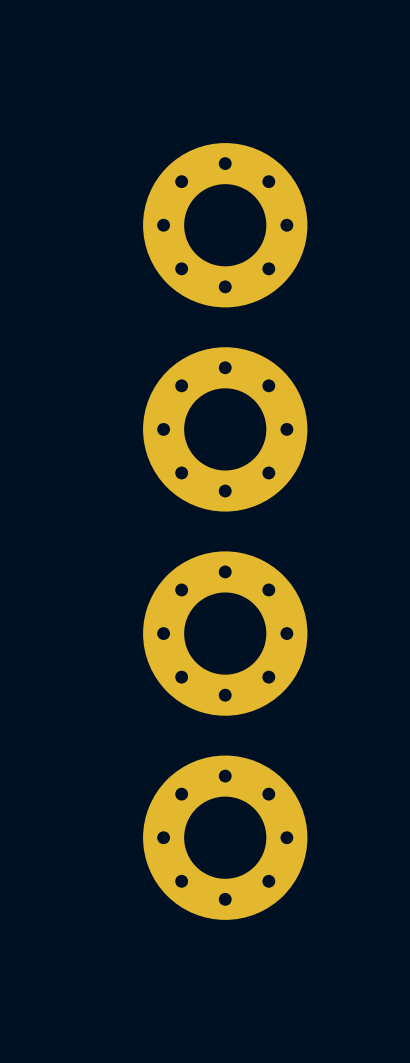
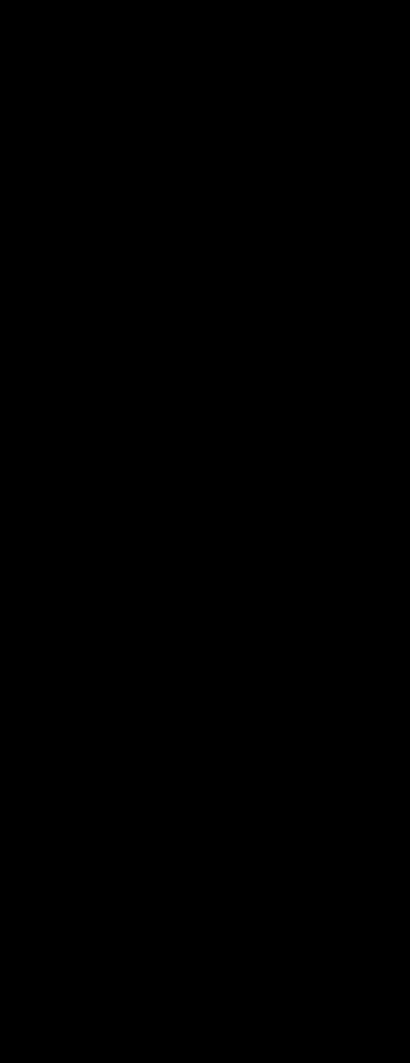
part: (225, 225) -> none
part: (225, 429) -> none
part: (225, 633) -> none
part: (225, 837) -> none

